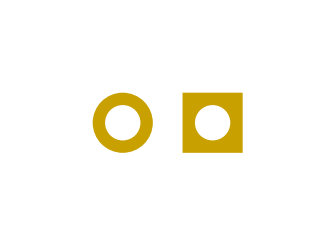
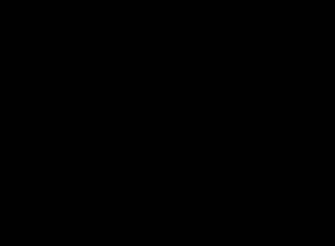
part: (167, 122) -> none

